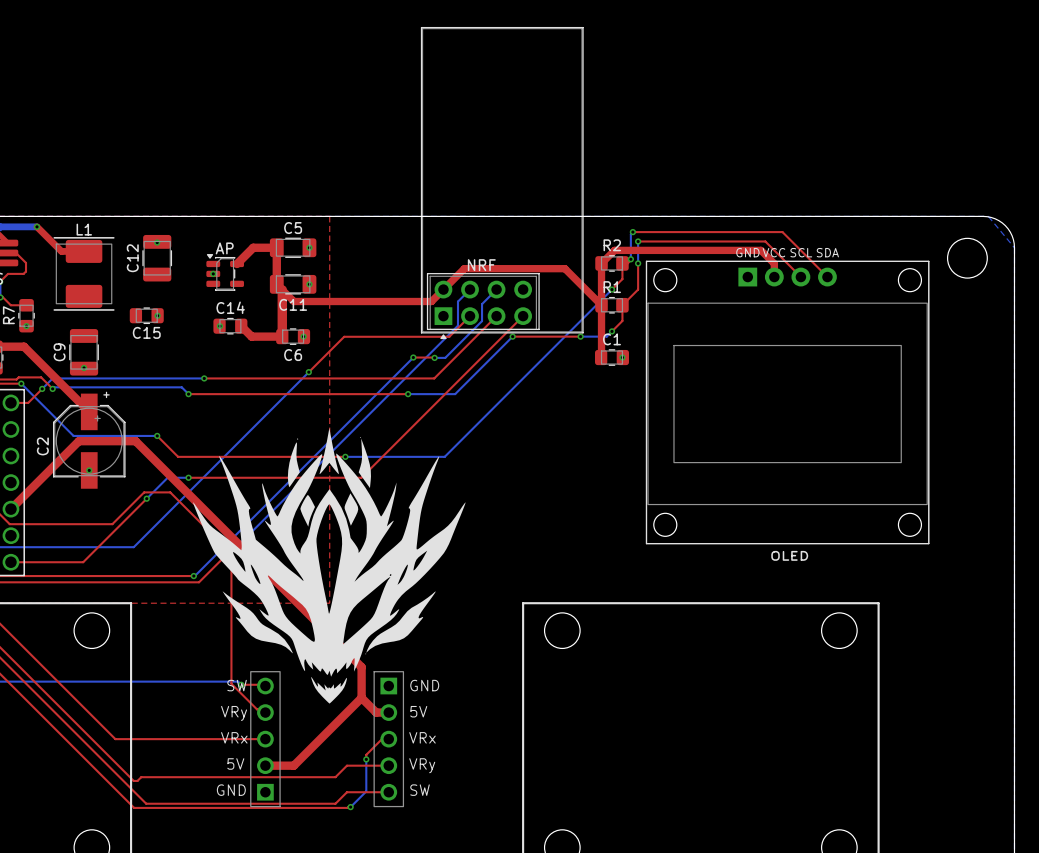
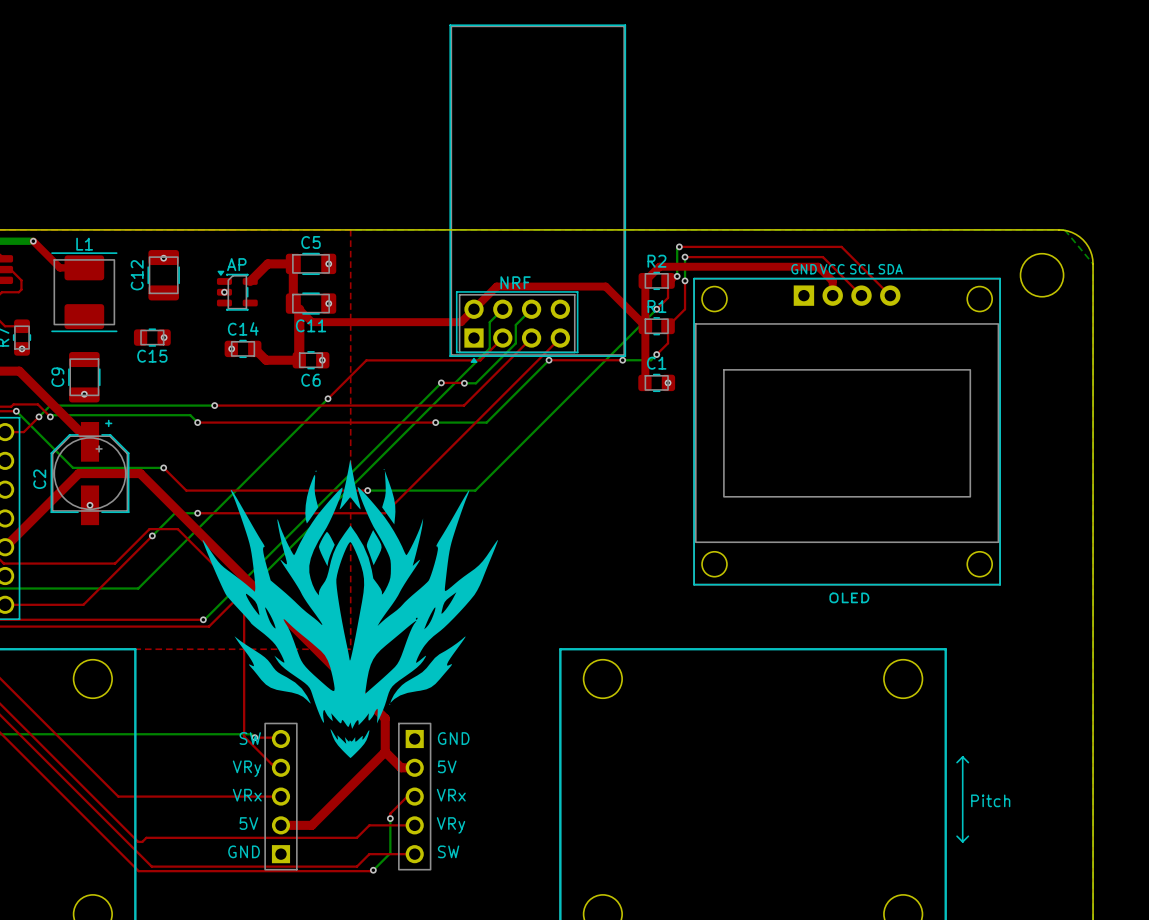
line: none -> (962, 756) (957, 762)
line: none -> (962, 756) (968, 762)
line: none -> (962, 756) (962, 841)
text: none -> Pitch (990, 800)
line: none -> (957, 836) (962, 841)
line: none -> (968, 836) (962, 841)

